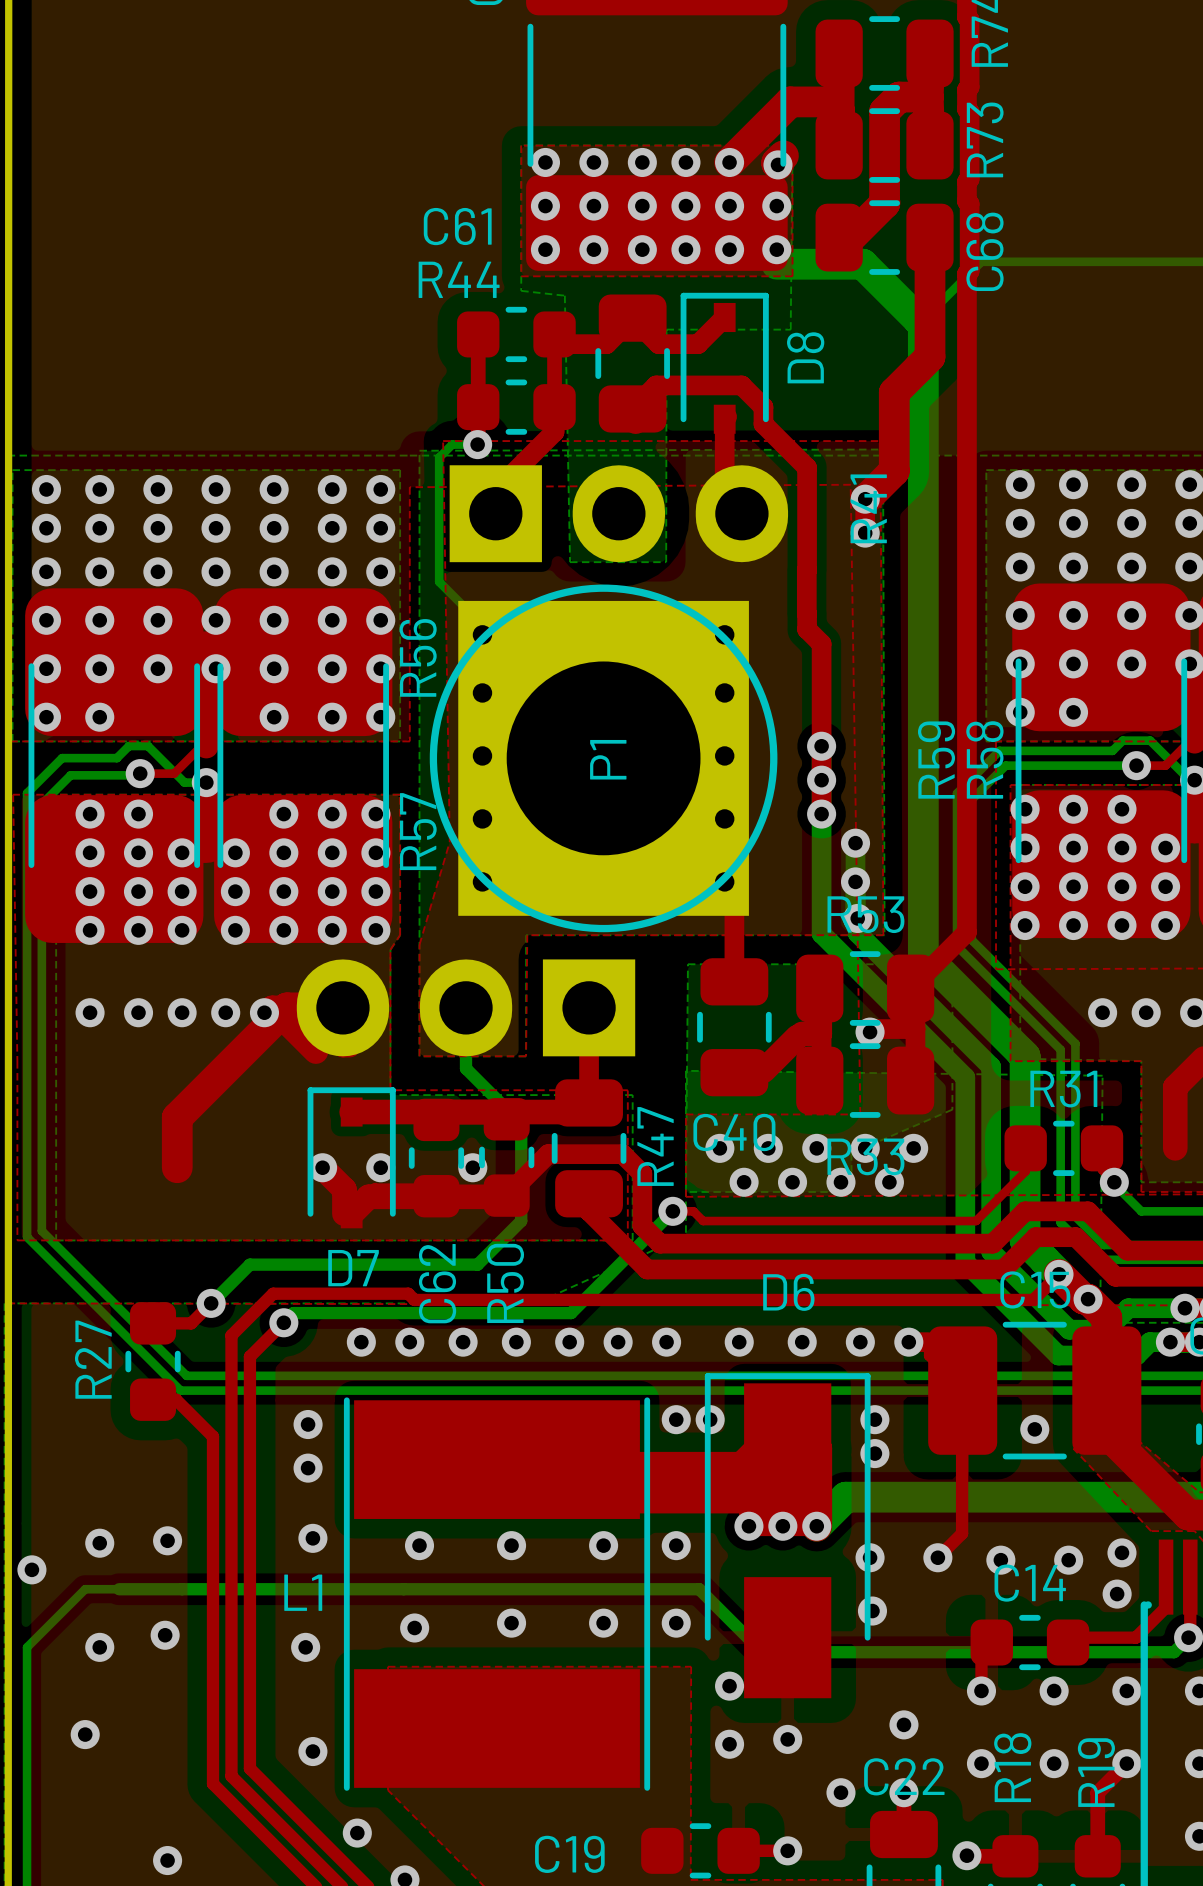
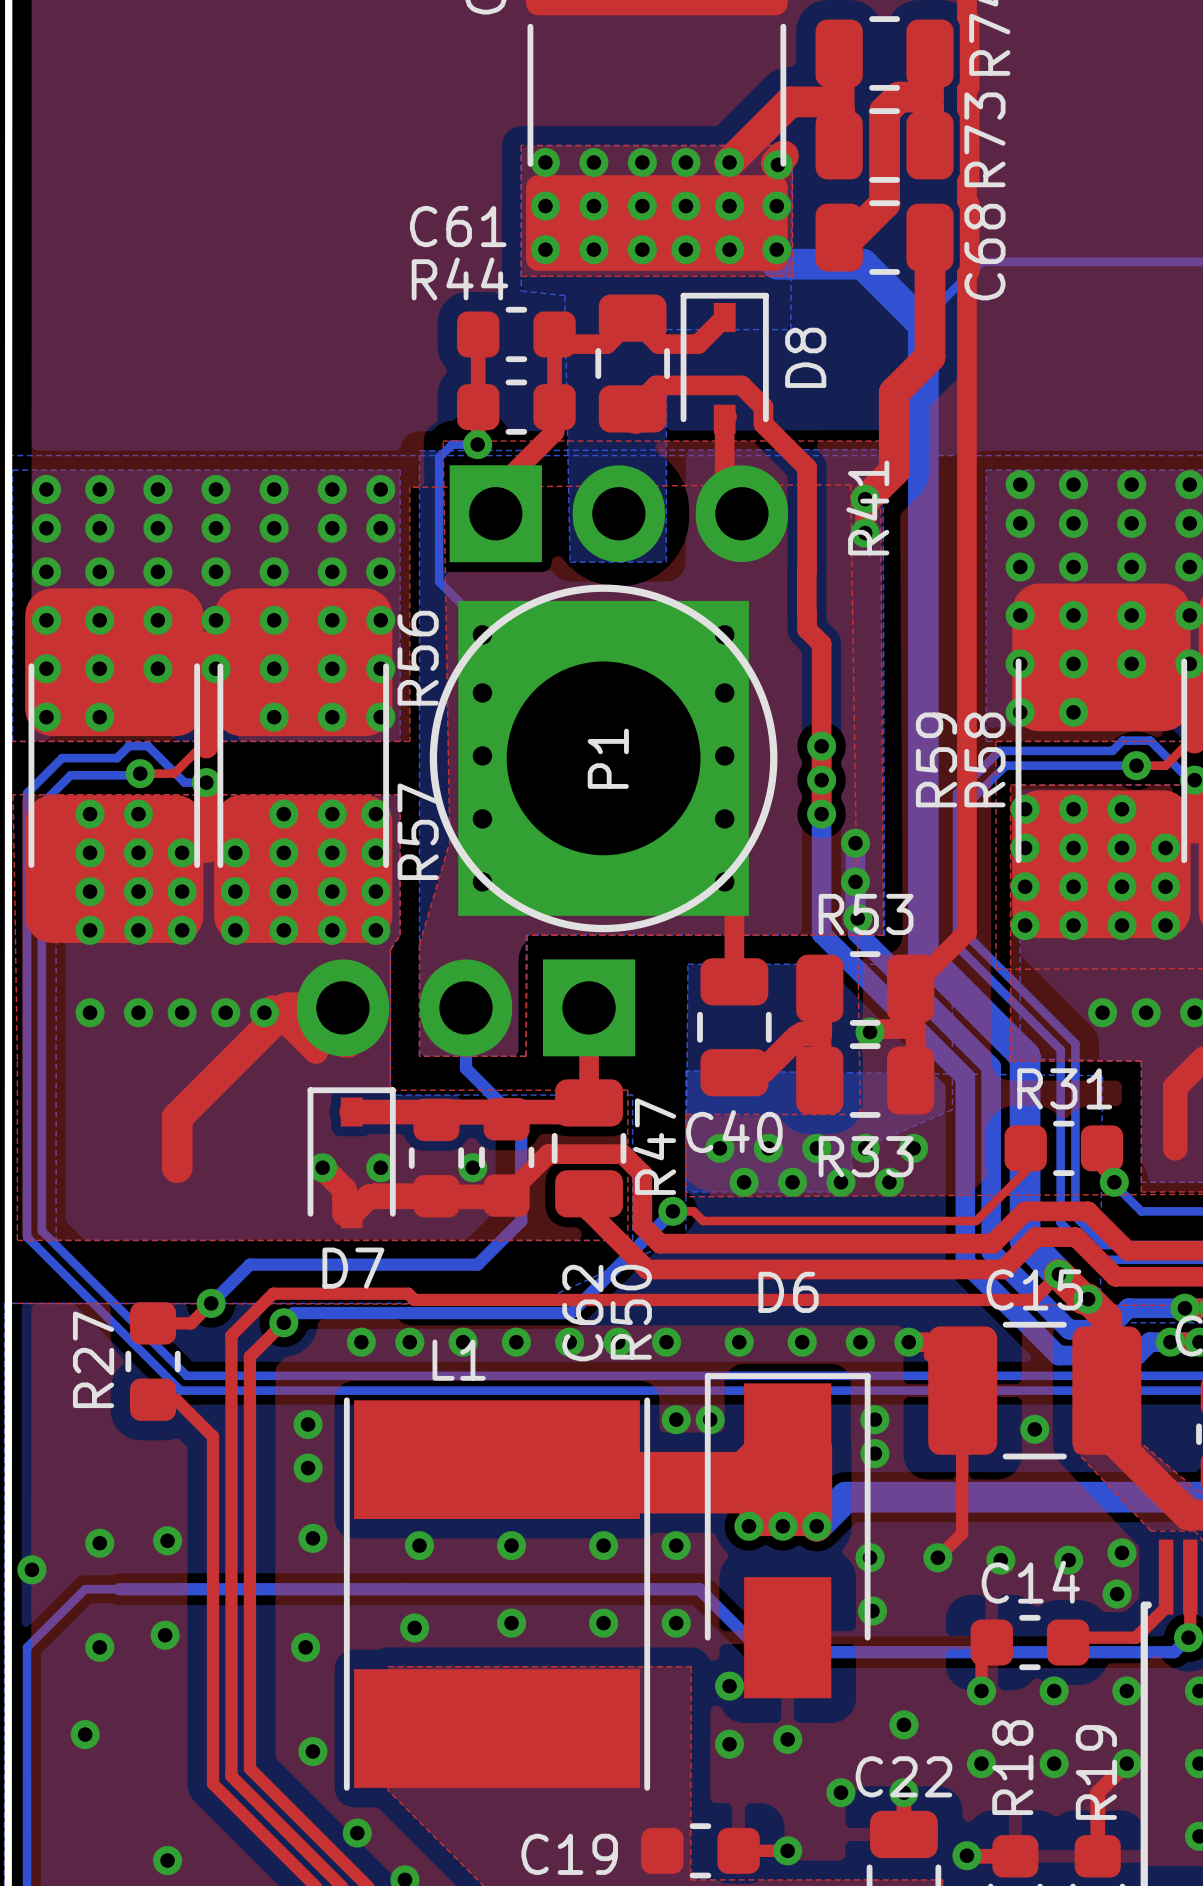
C62 name position: C62 (437, 1283) -> C62 (582, 1313)
R50 name position: R50 (505, 1283) -> R50 (631, 1312)
L1 name position: L1 (303, 1592) -> L1 (459, 1360)

